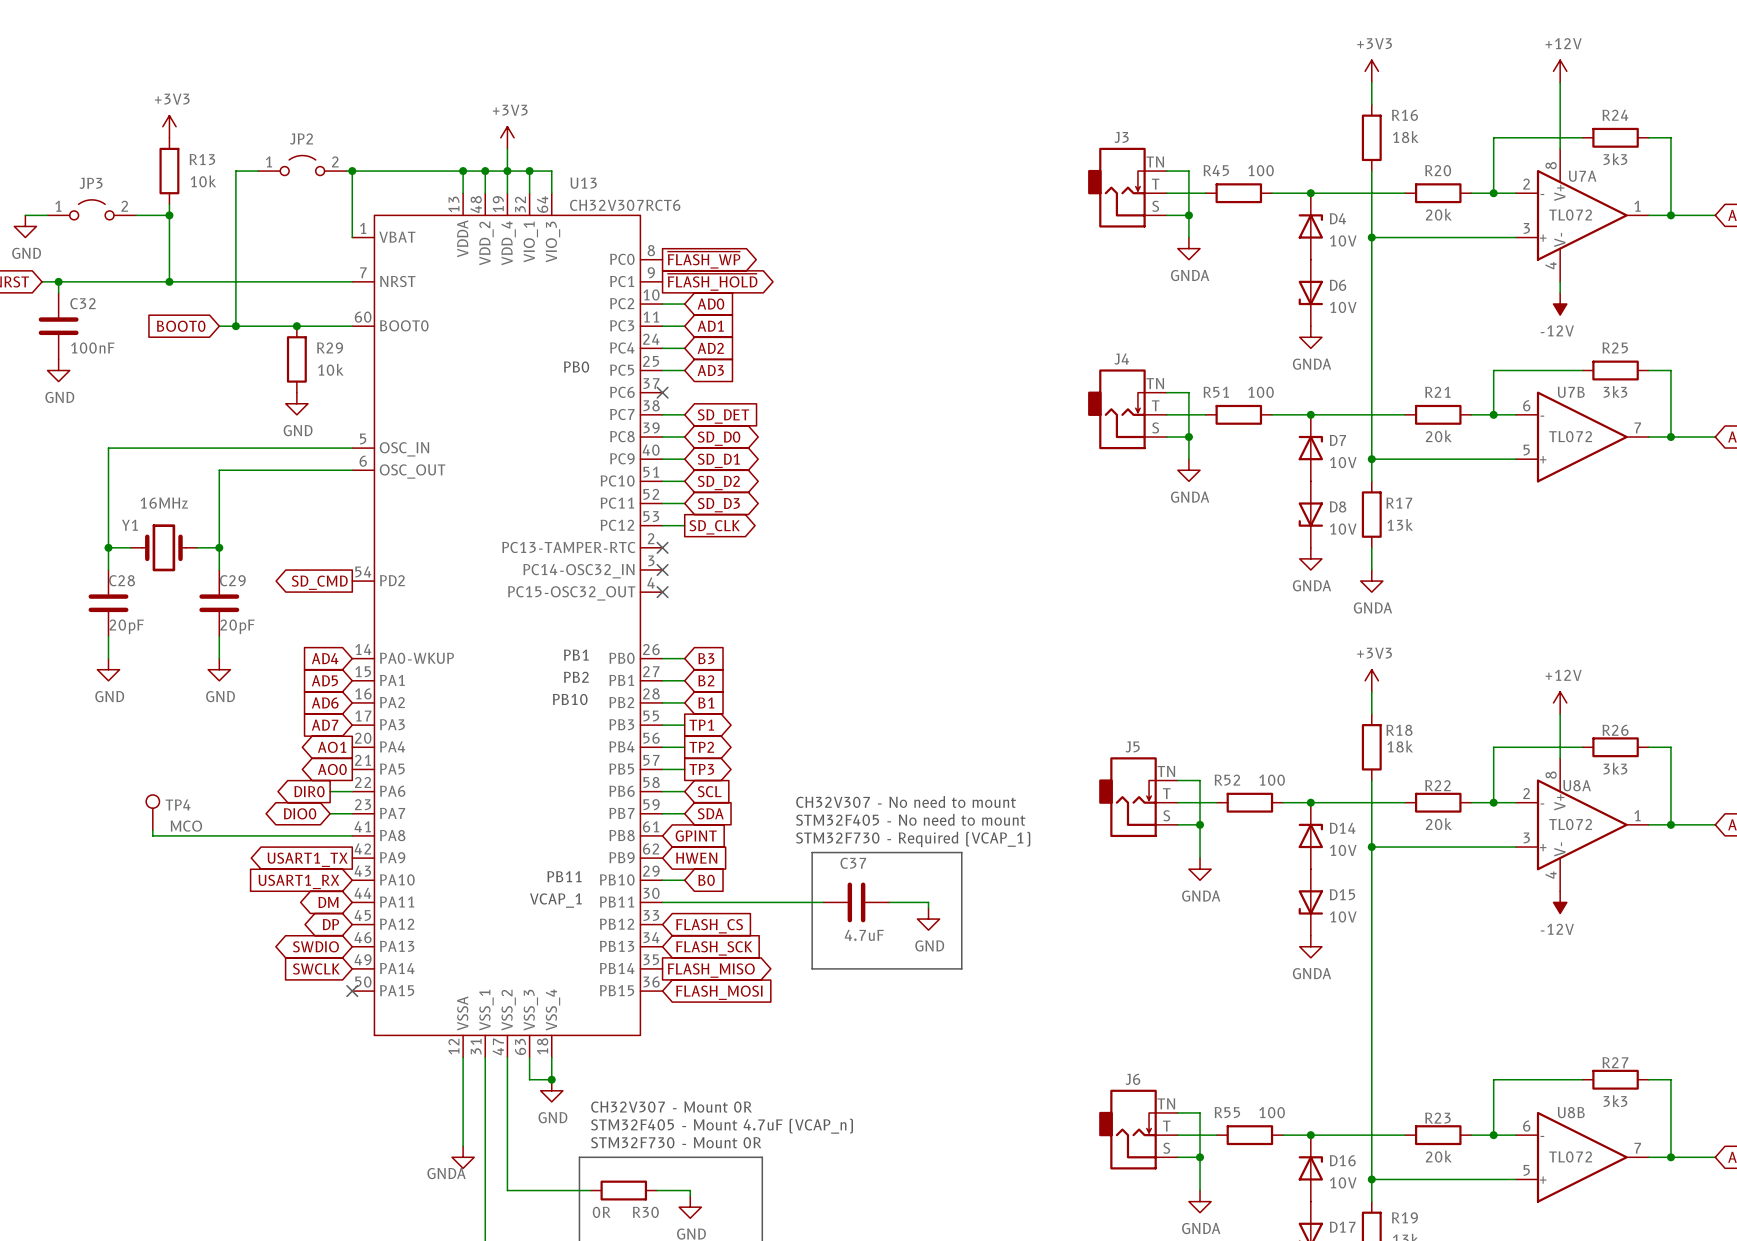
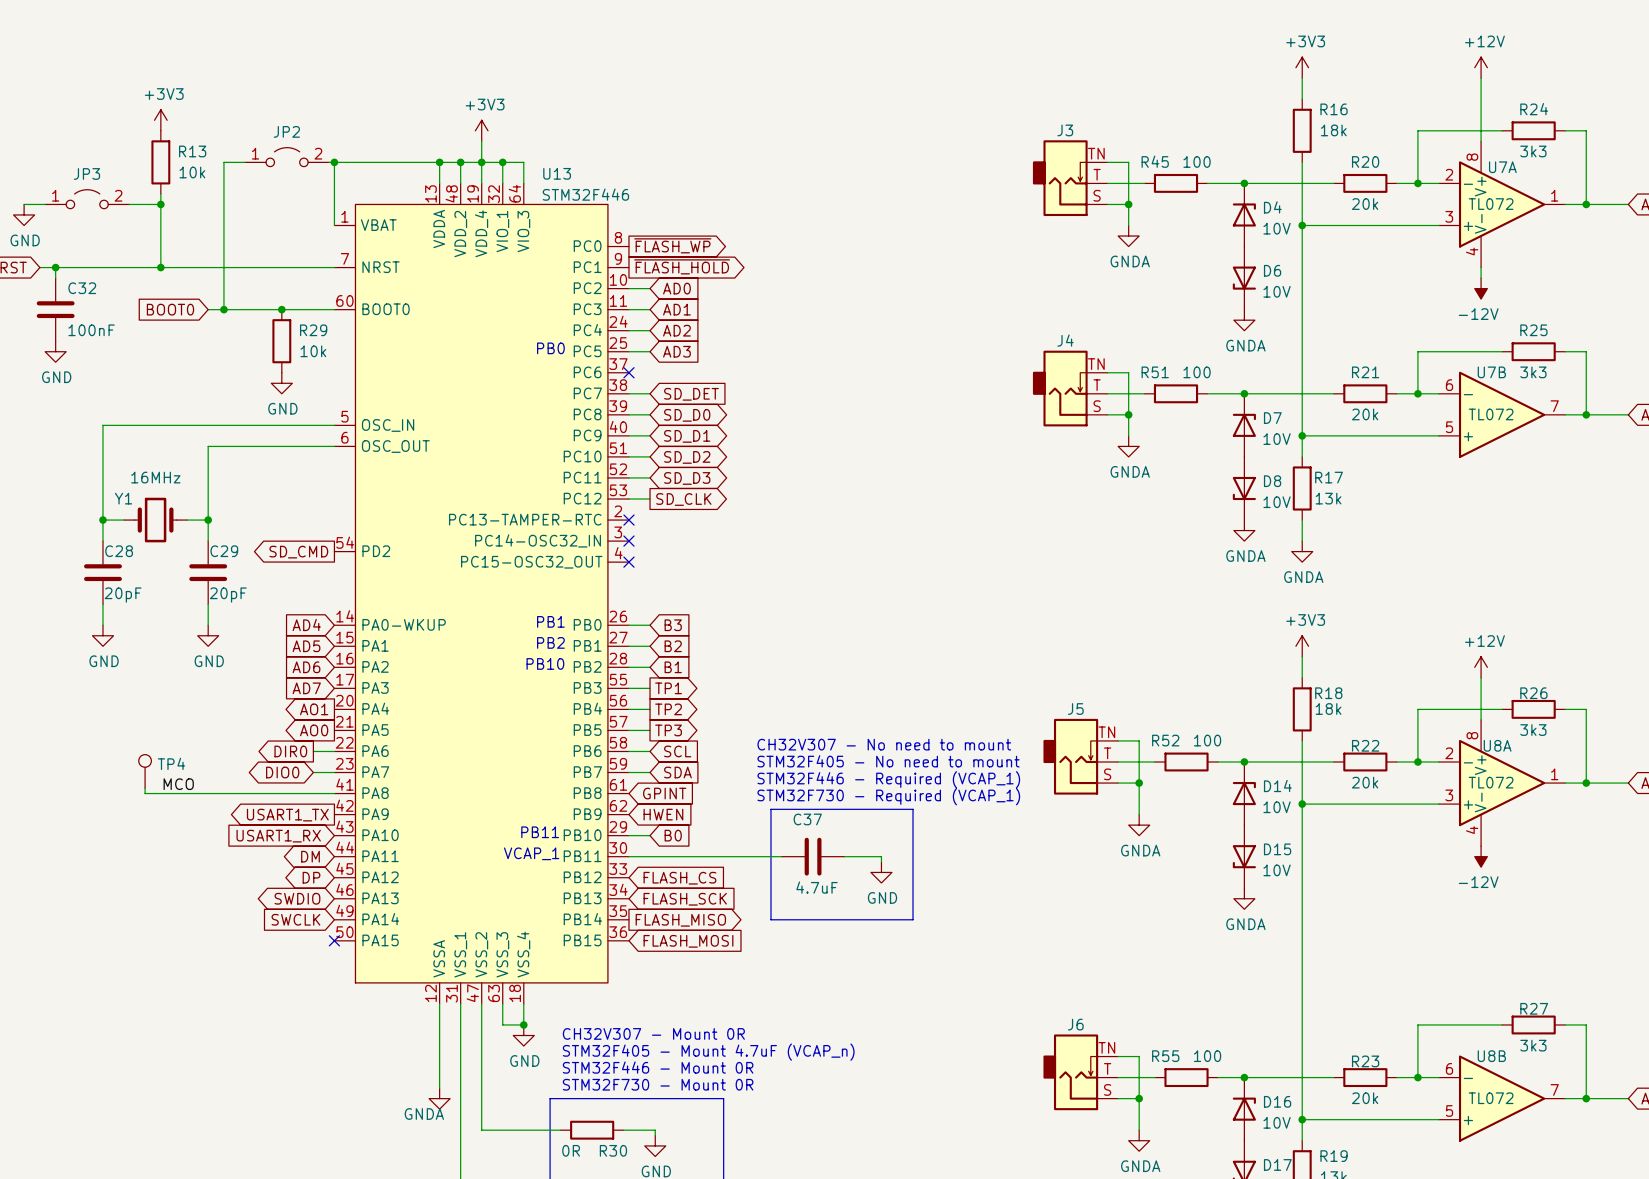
U13 value: CH32V307RCT6 (625, 205) -> STM32F446 (585, 194)
text: none -> CH32V307 - No need to mount (884, 744)
text: CH32V307 - No need to mount (906, 801) -> STM32F405 - No need to mount (888, 761)
text: STM32F405 - No need to mount (910, 819) -> STM32F446 - Required (VCAP_1) (888, 779)
text: none -> CH32V307 - Mount 0R (653, 1033)
text: CH32V307 - Mount 0R (671, 1107) -> STM32F405 - Mount 4.7uF (VCAP_n) (708, 1052)
text: STM32F405 - Mount 4.7uF (VCAP_n) (722, 1126) -> STM32F446 - Mount 0R (658, 1067)

